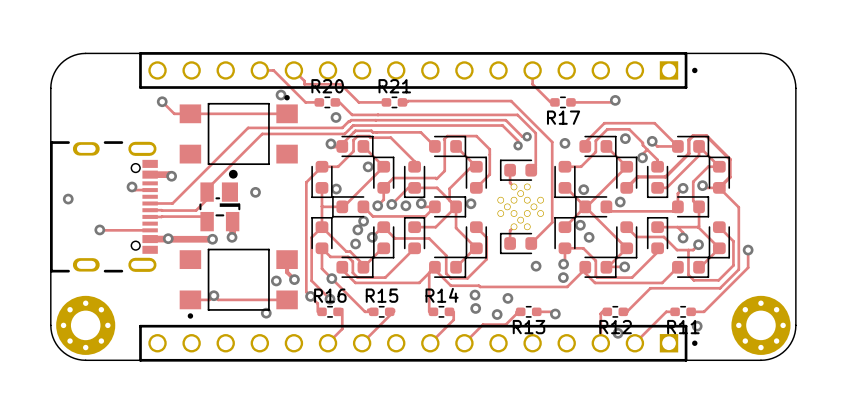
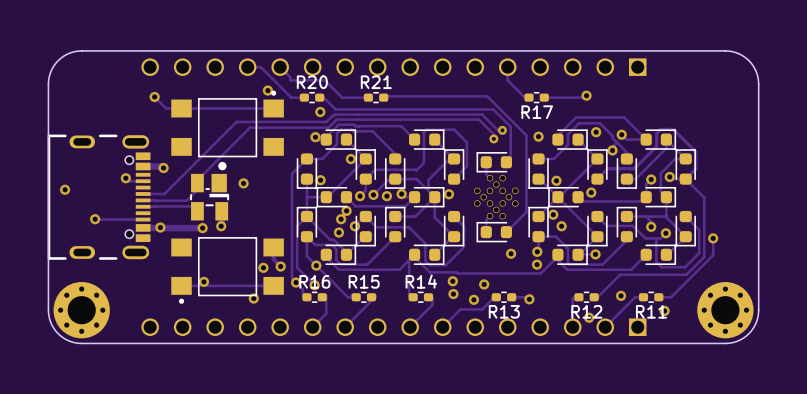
part footprint: [139, 52, 698, 89] -> [141, 58, 647, 76]
via: none -> (621, 295)
part footprint: [139, 324, 698, 362] -> [141, 318, 647, 336]

